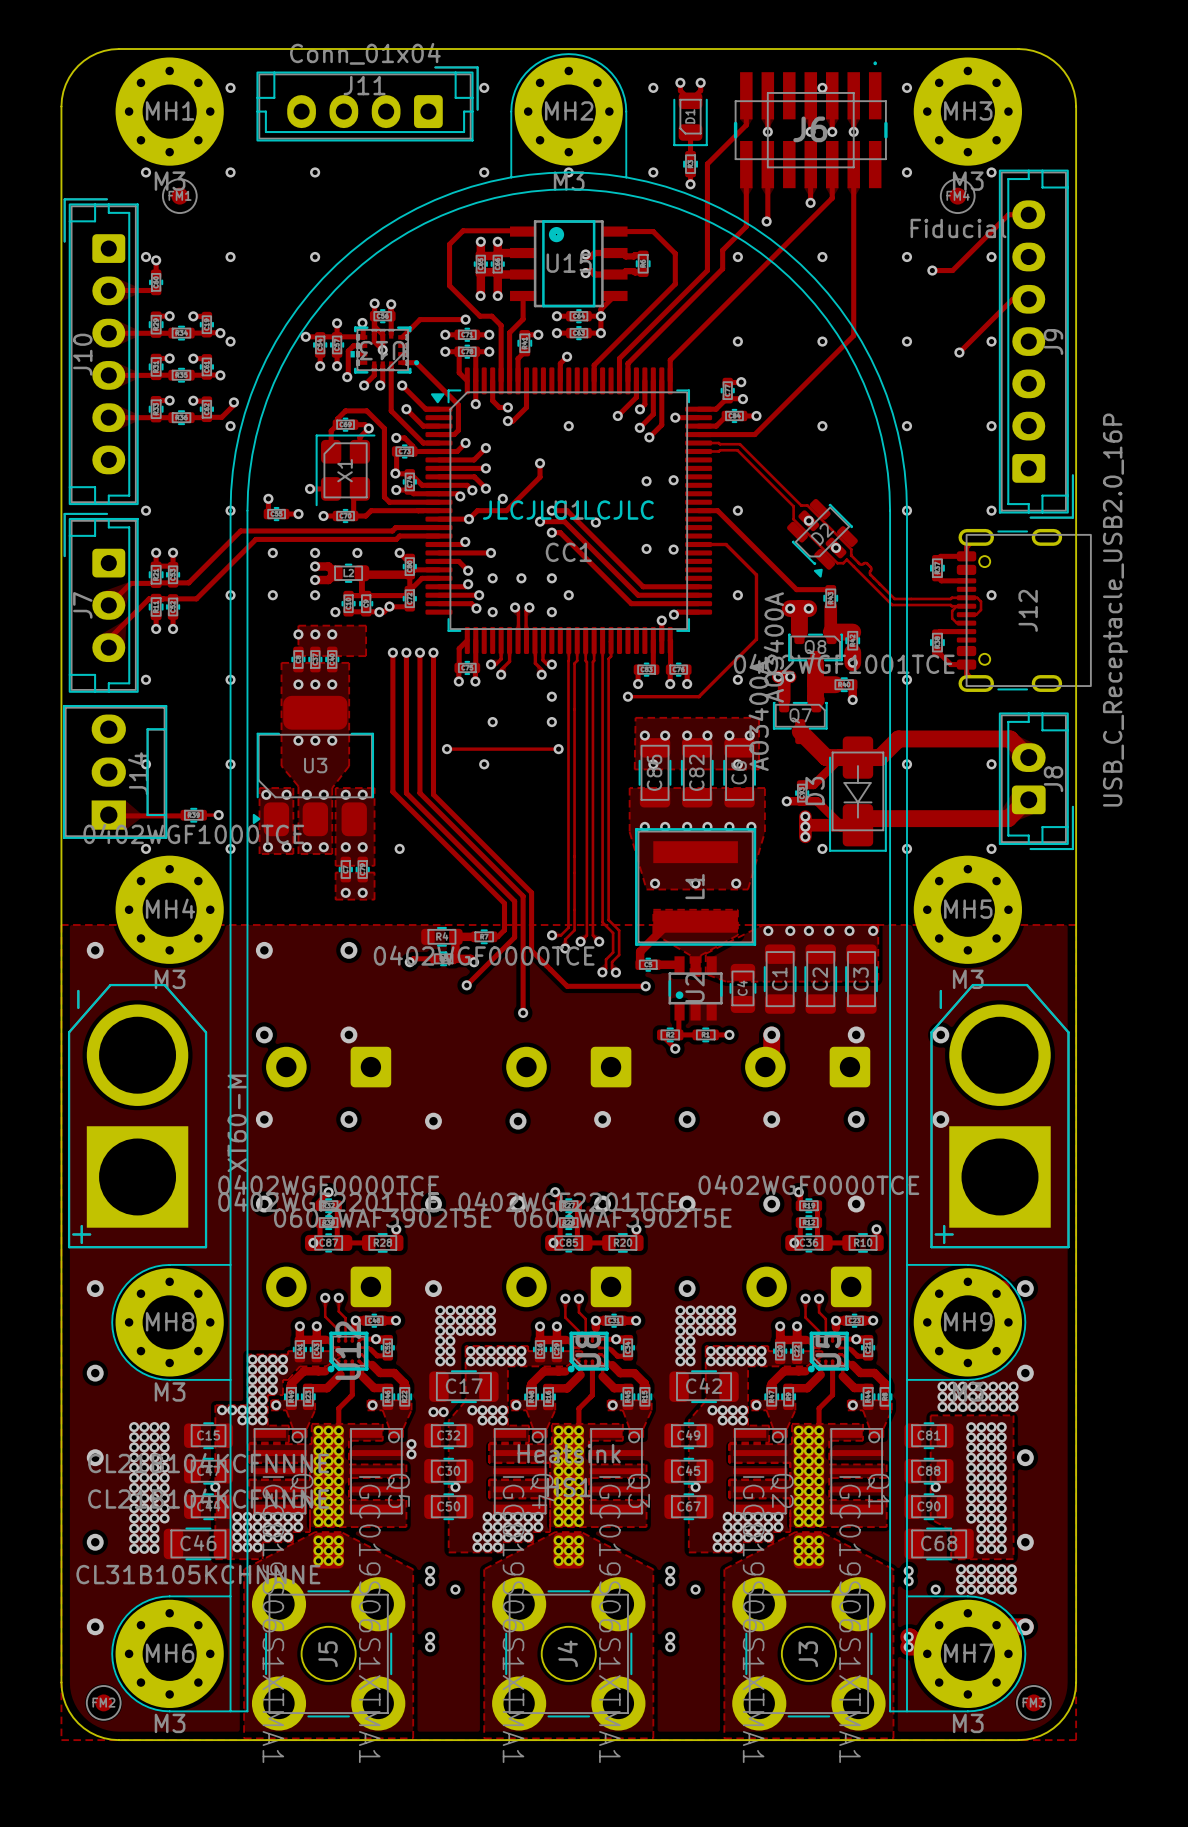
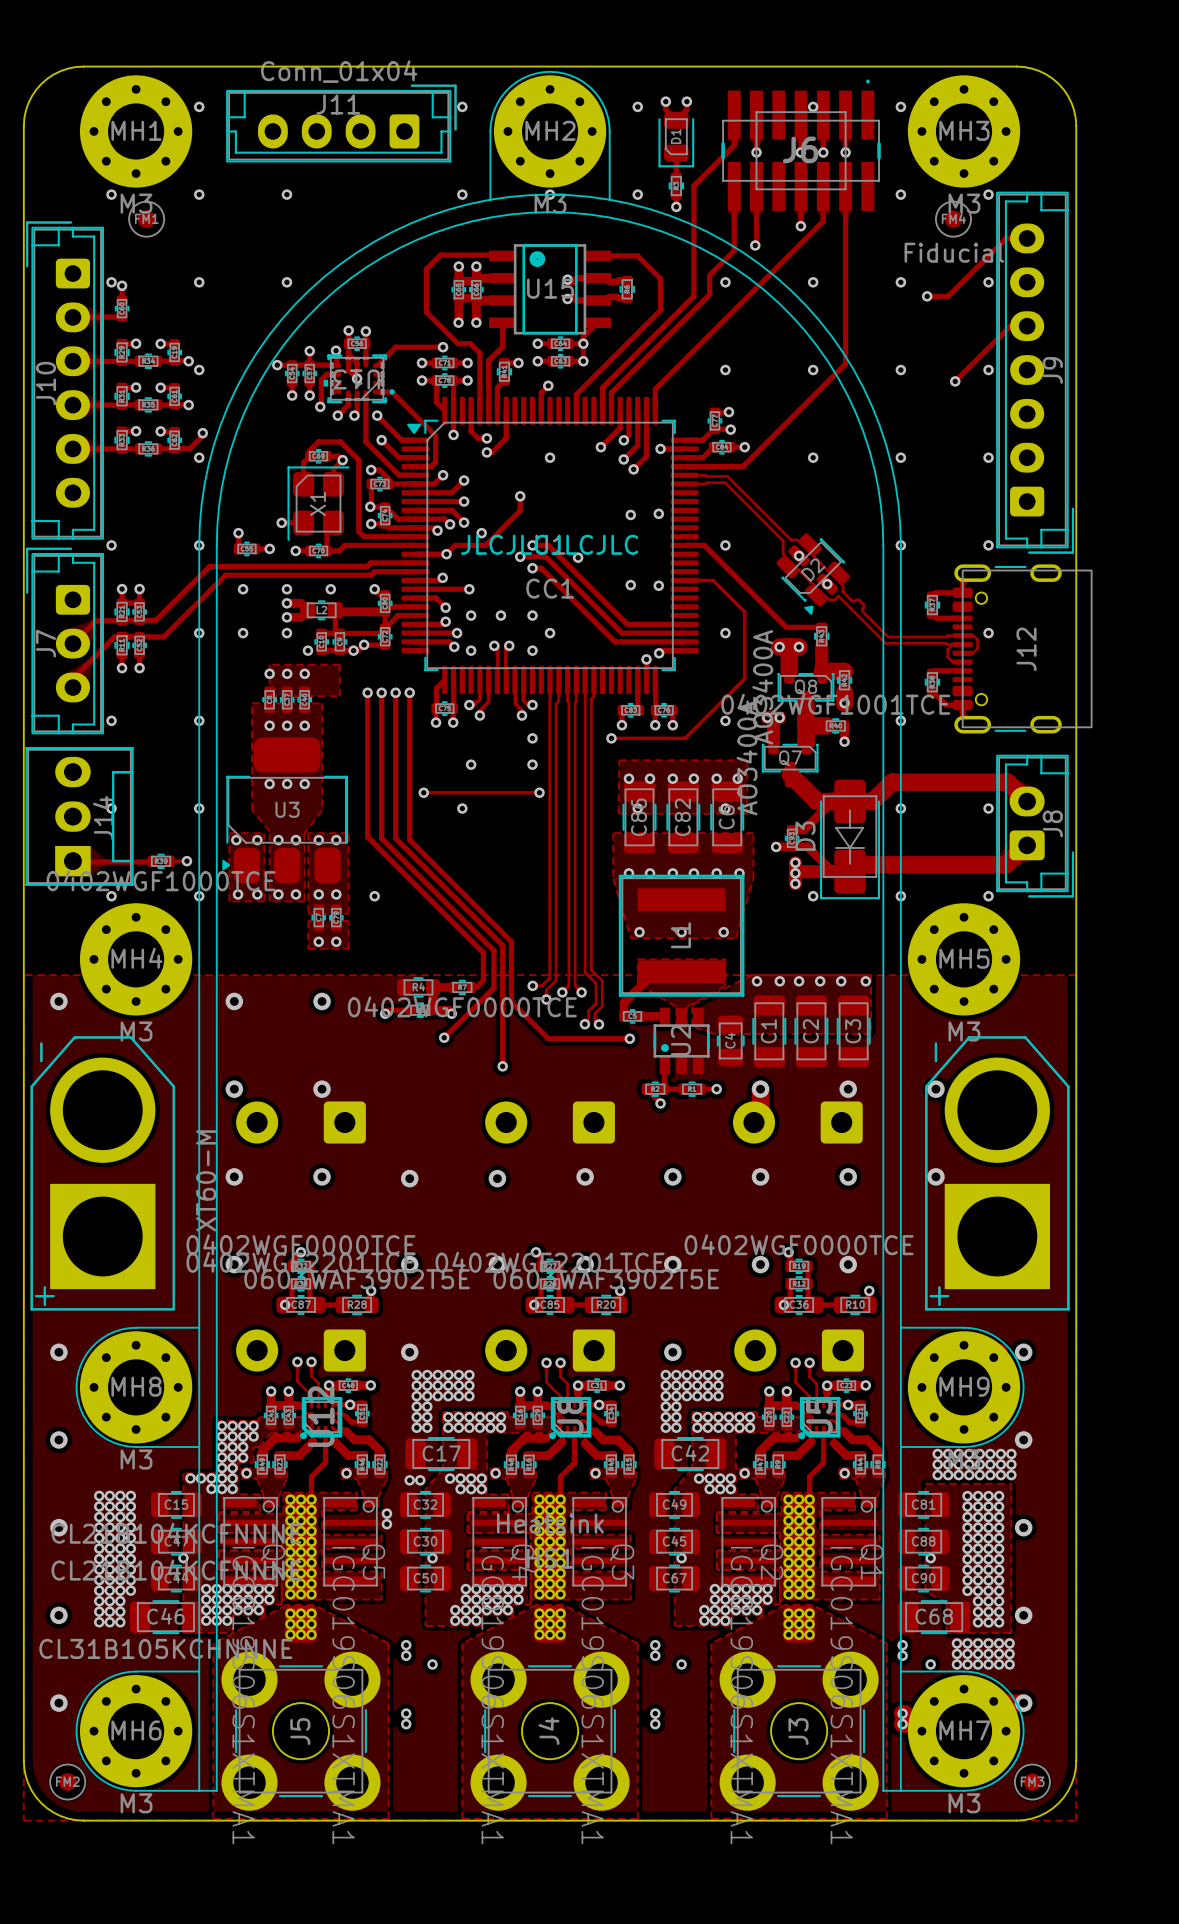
J12 value: USB_C_Receptacle_USB2.0_16P (1115, 610) -> none

